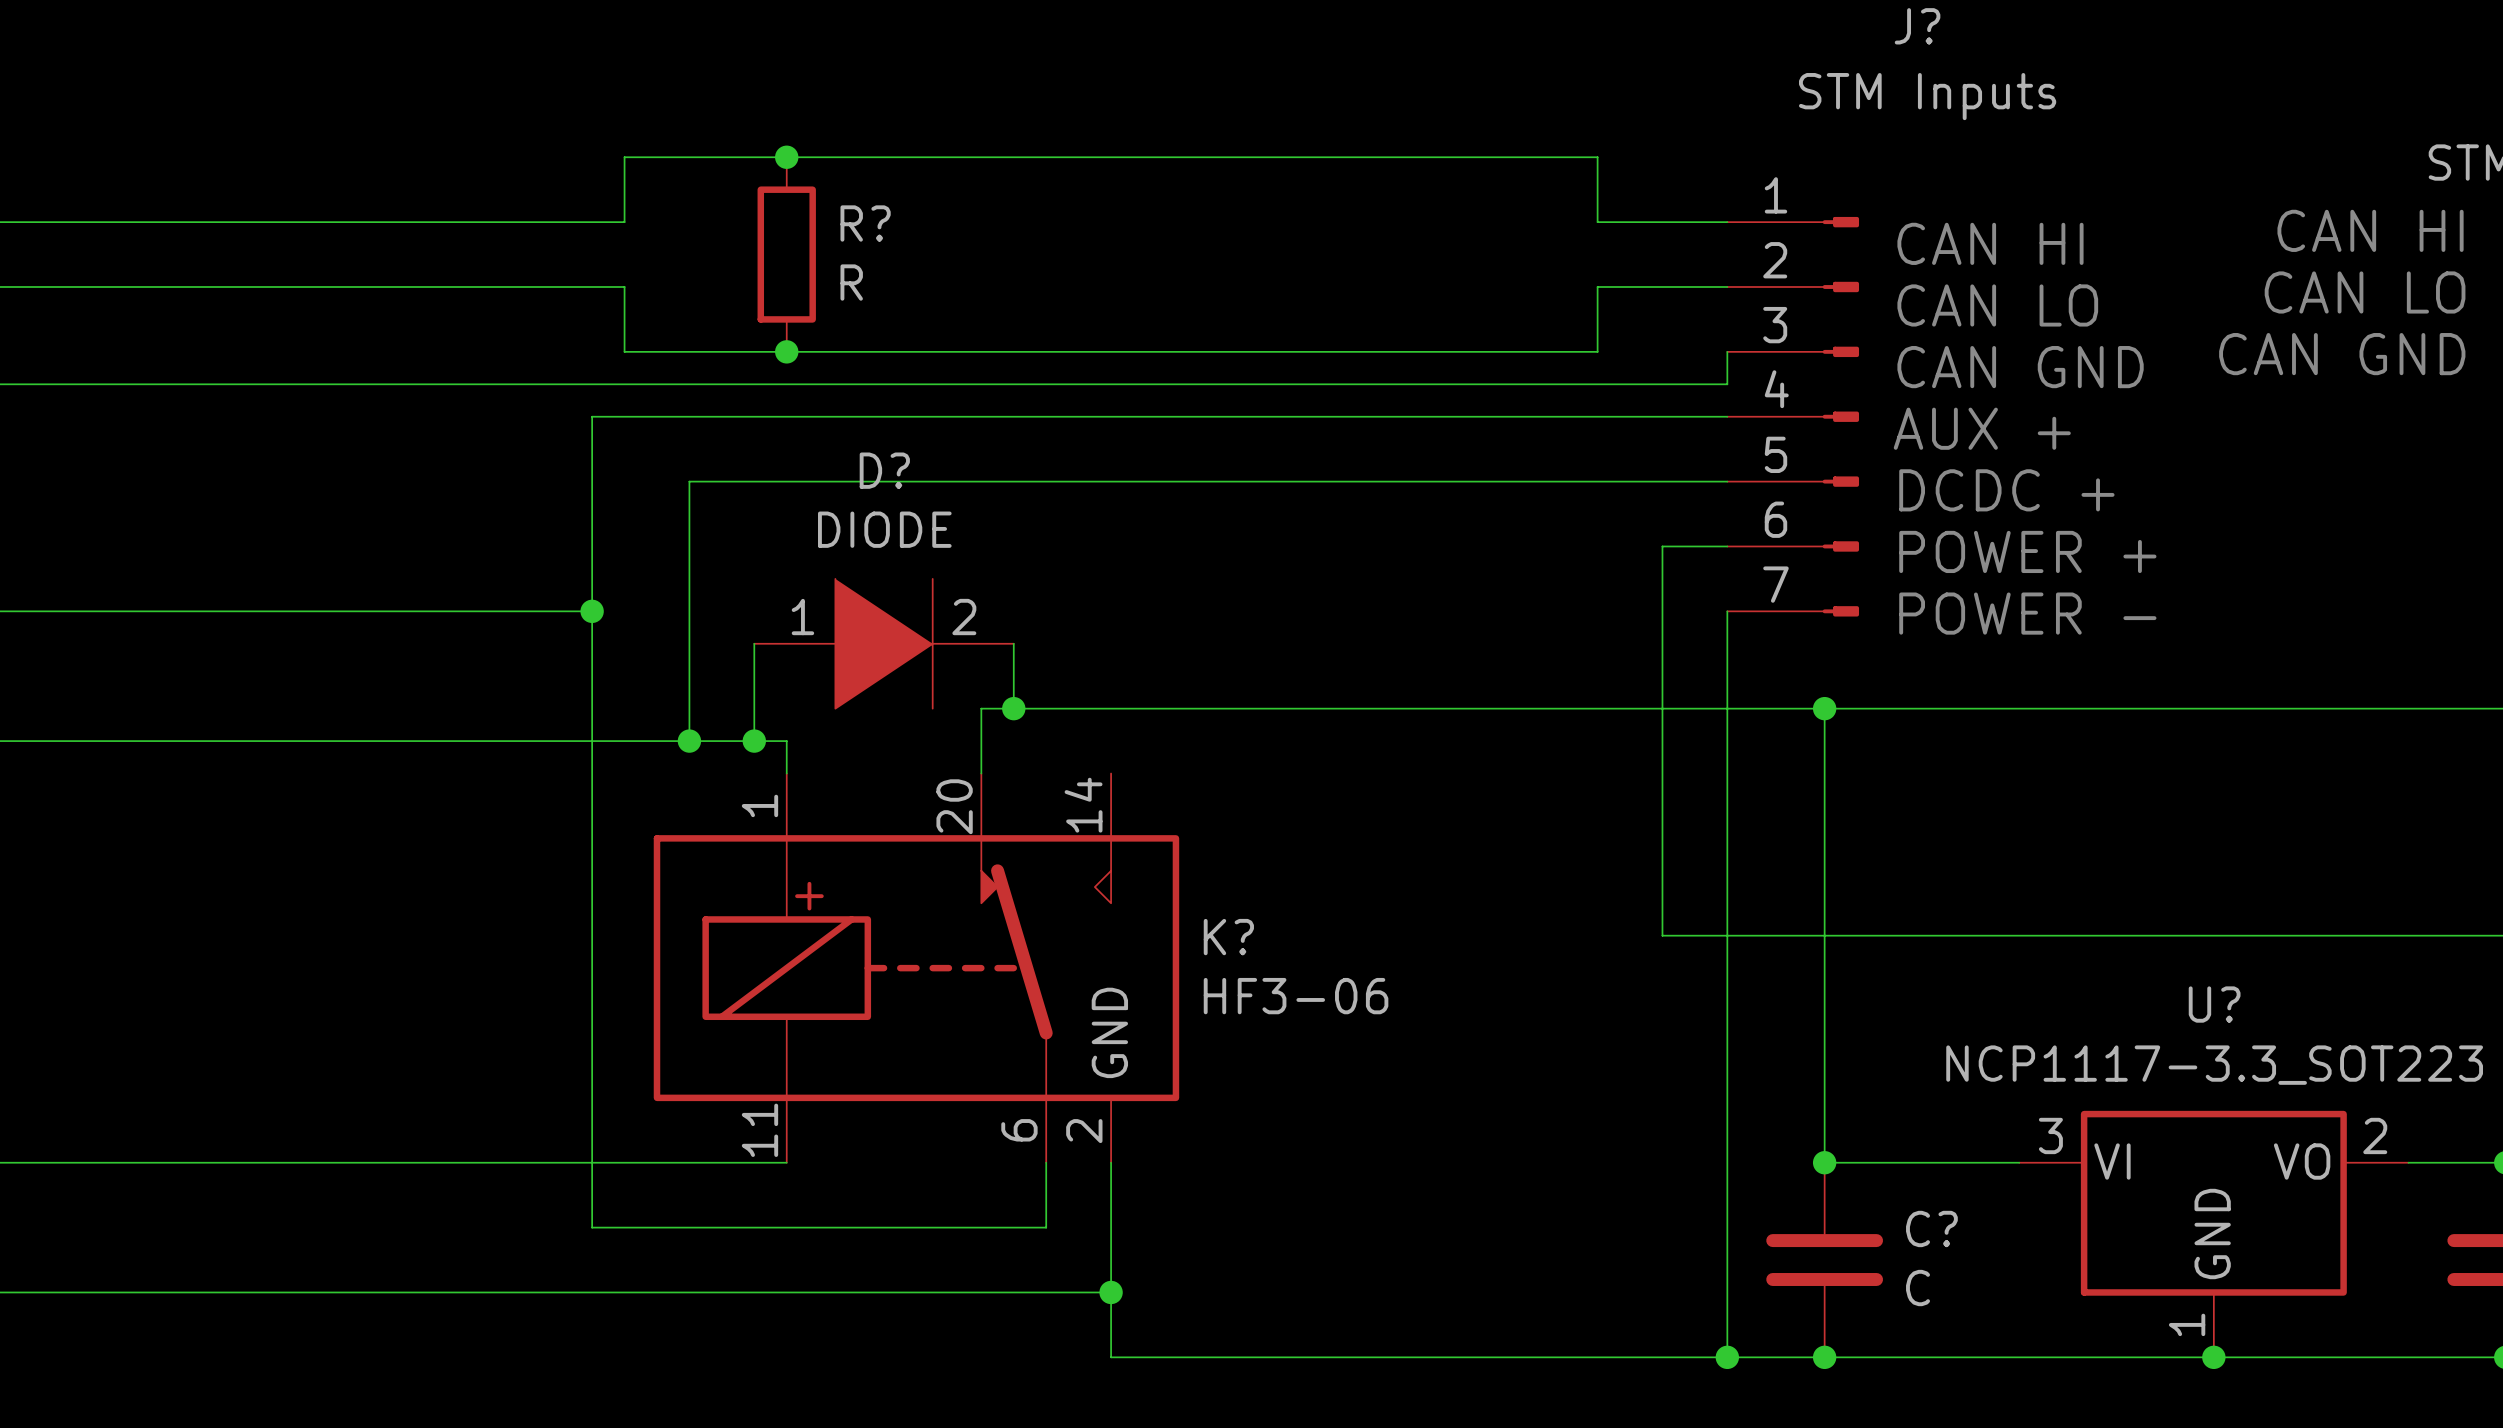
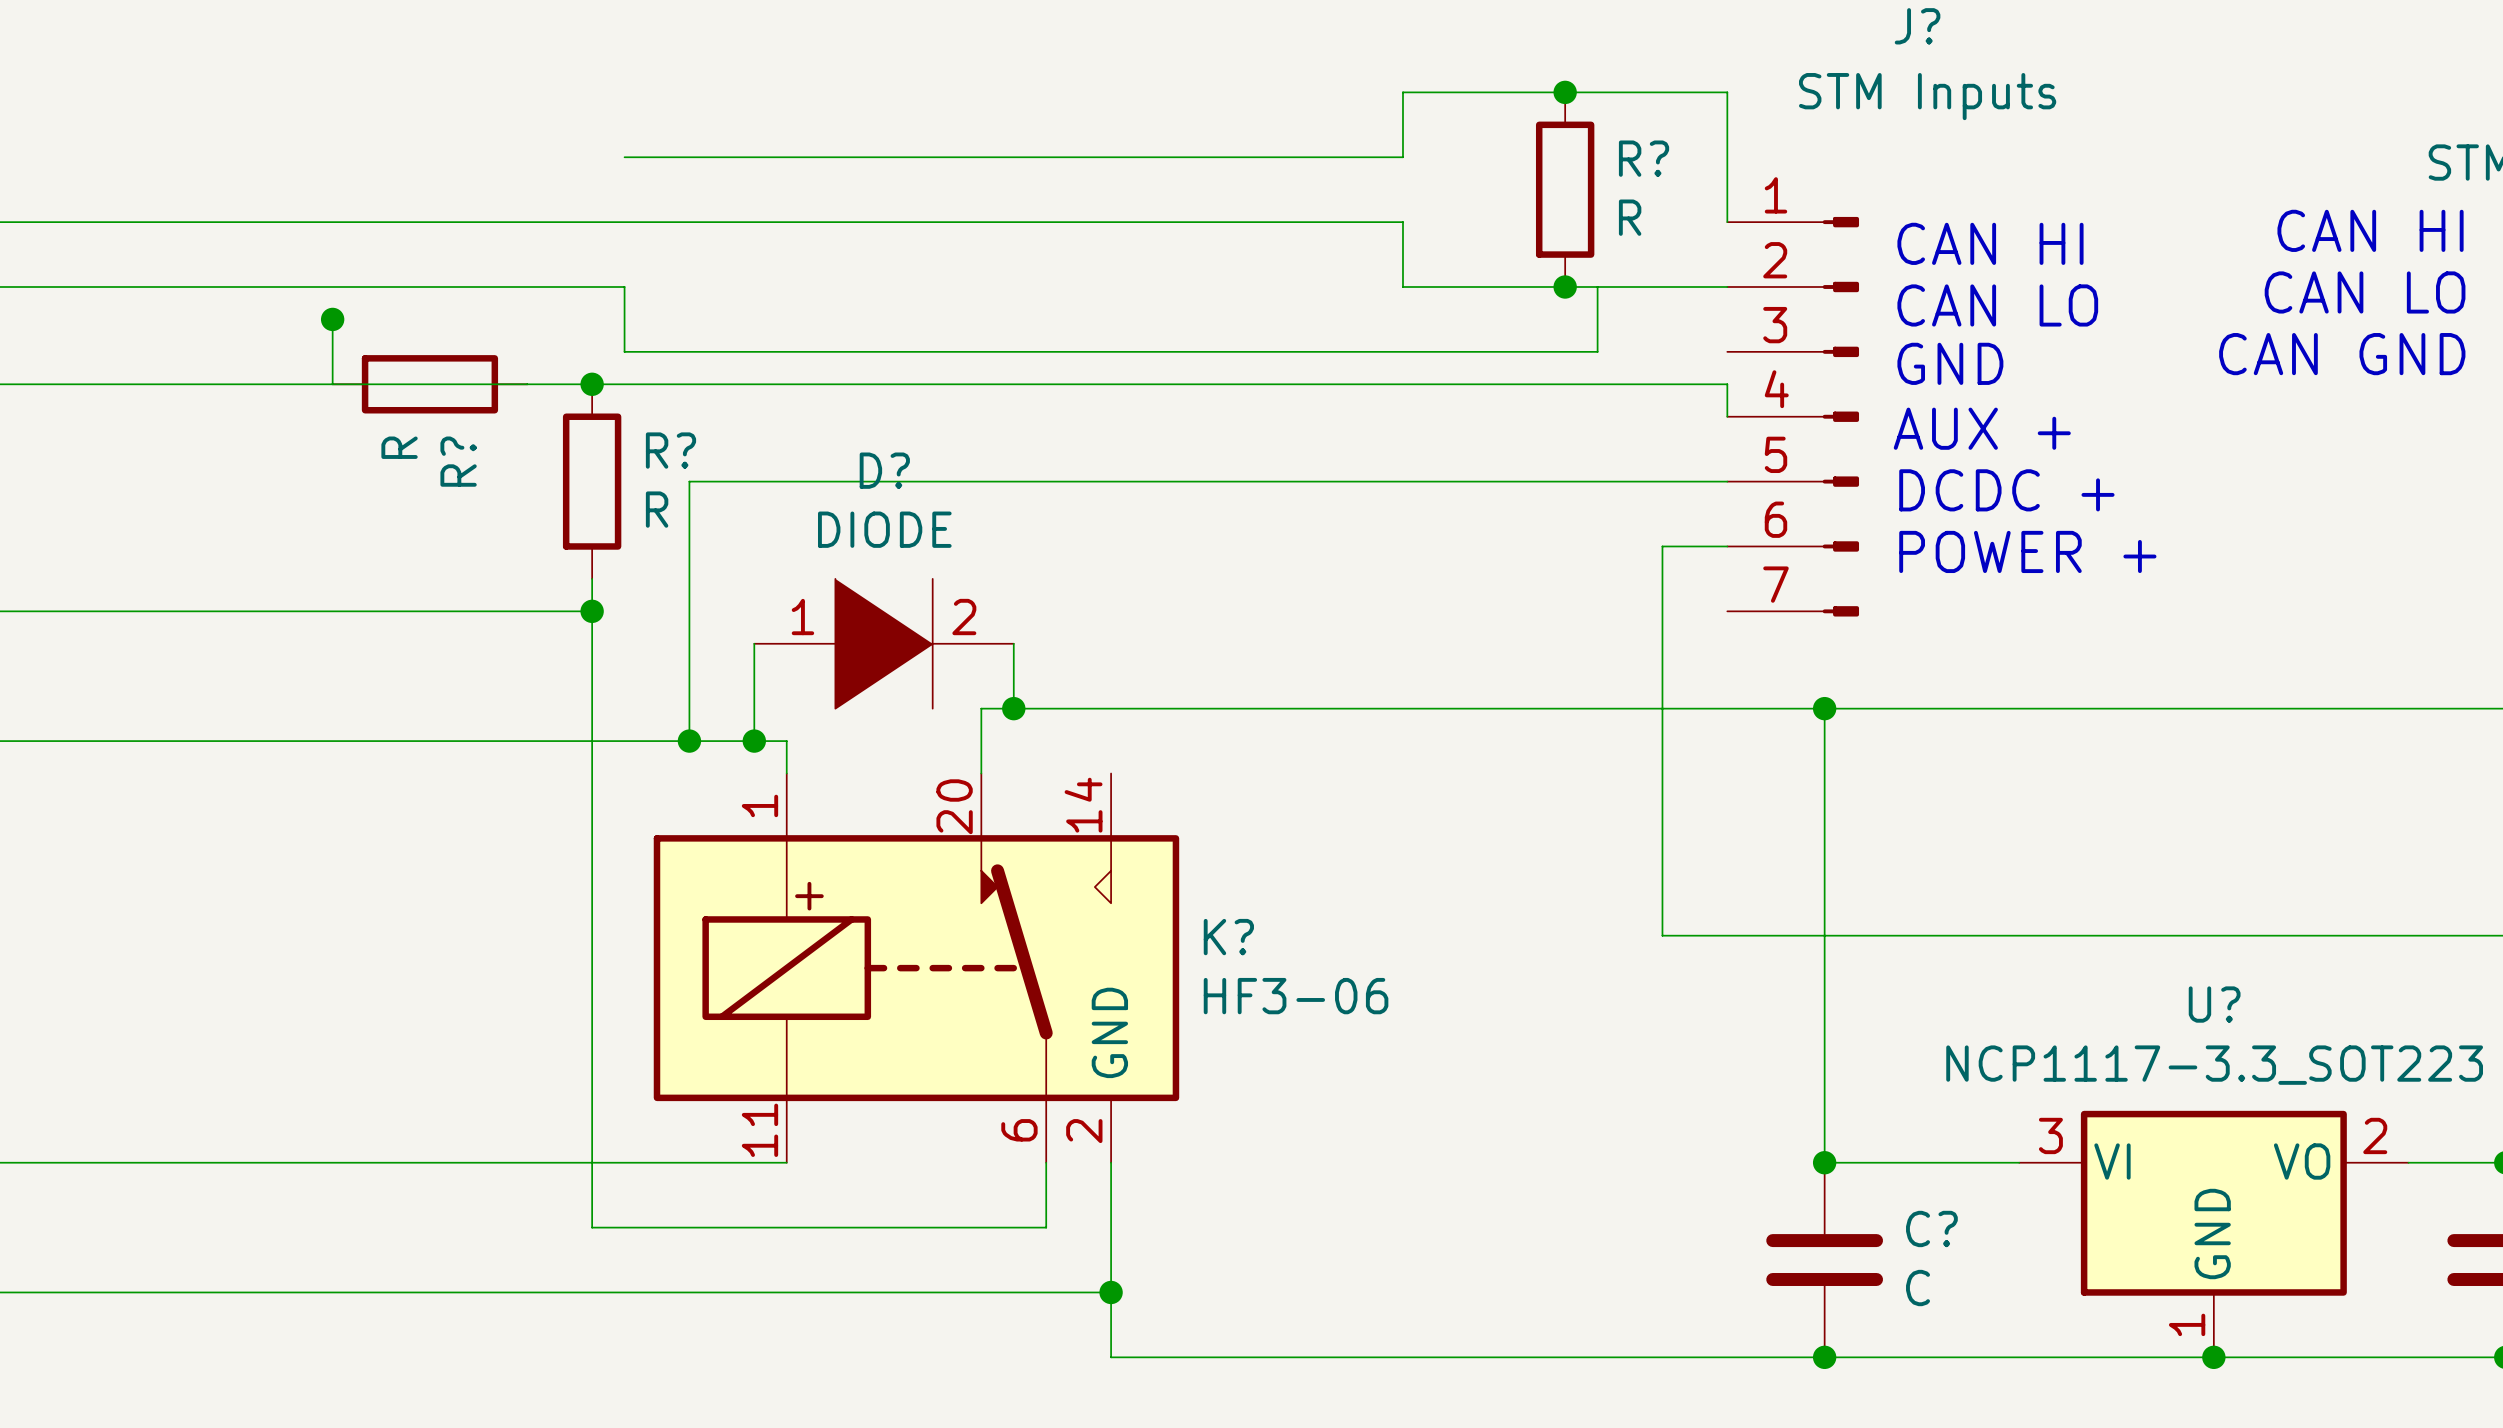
junction: none -> (1565, 92)
wire: (624, 157) (624, 222) -> (1597, 286) (1402, 286) (1402, 222) (624, 222)
junction: (786, 157) -> none
wire: (1402, 157) (1597, 157) (1597, 222) (1727, 222) -> (1402, 157) (1402, 92) (1727, 92) (1727, 222)
R?: none -> R (1565, 189)
R?: R (786, 254) -> none
junction: none -> (1565, 286)
wire: none -> (332, 319) (332, 384)
junction: none -> (332, 319)
junction: (786, 351) -> none
wire: (1727, 351) (1727, 384) -> (1727, 416) (1727, 384)
text: CAN GND (2020, 367) -> GND (1950, 363)
R?: none -> R (429, 384)
junction: none -> (592, 384)
wire: (1727, 416) (592, 416) (592, 578) -> none
R?: none -> R (592, 481)
wire: (1727, 611) (1727, 1357) -> none
text: POWER - (2027, 613) -> none
junction: (1727, 1357) -> none

